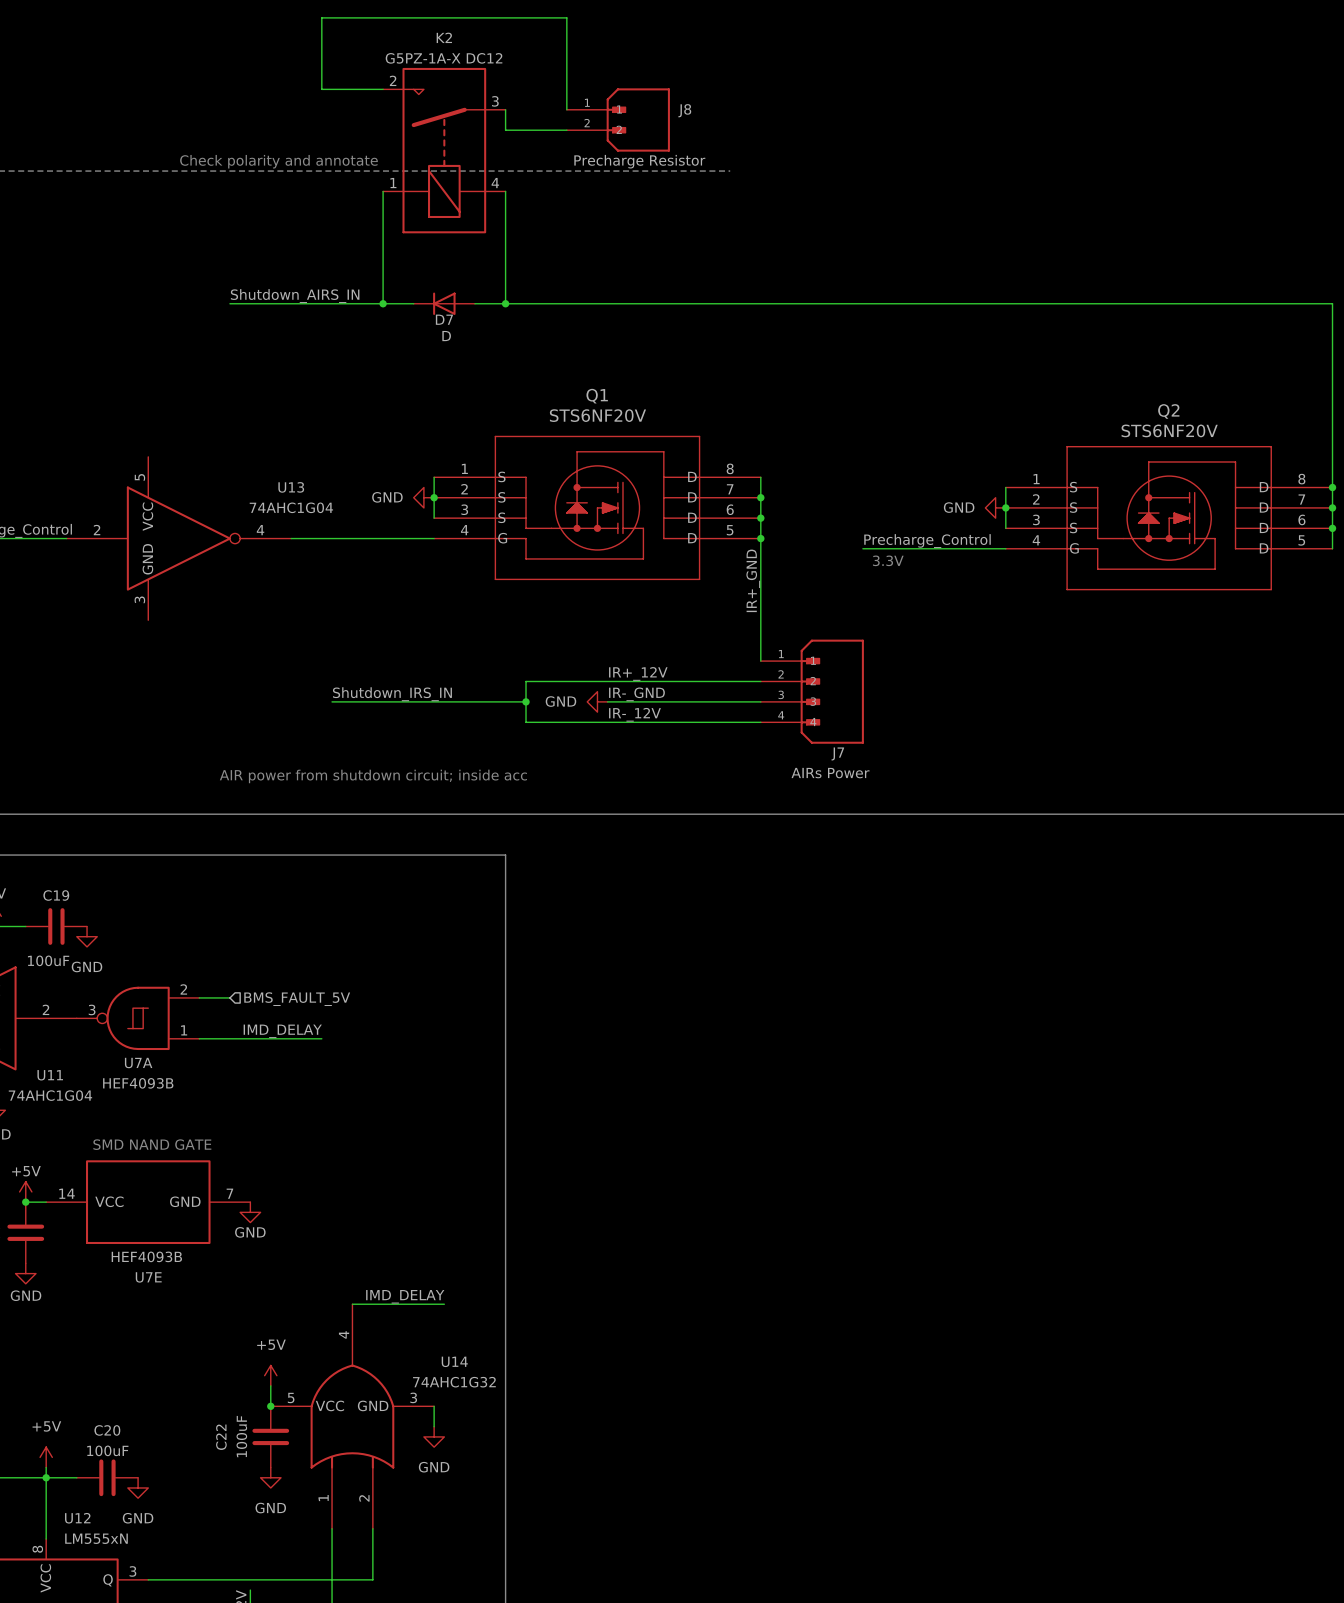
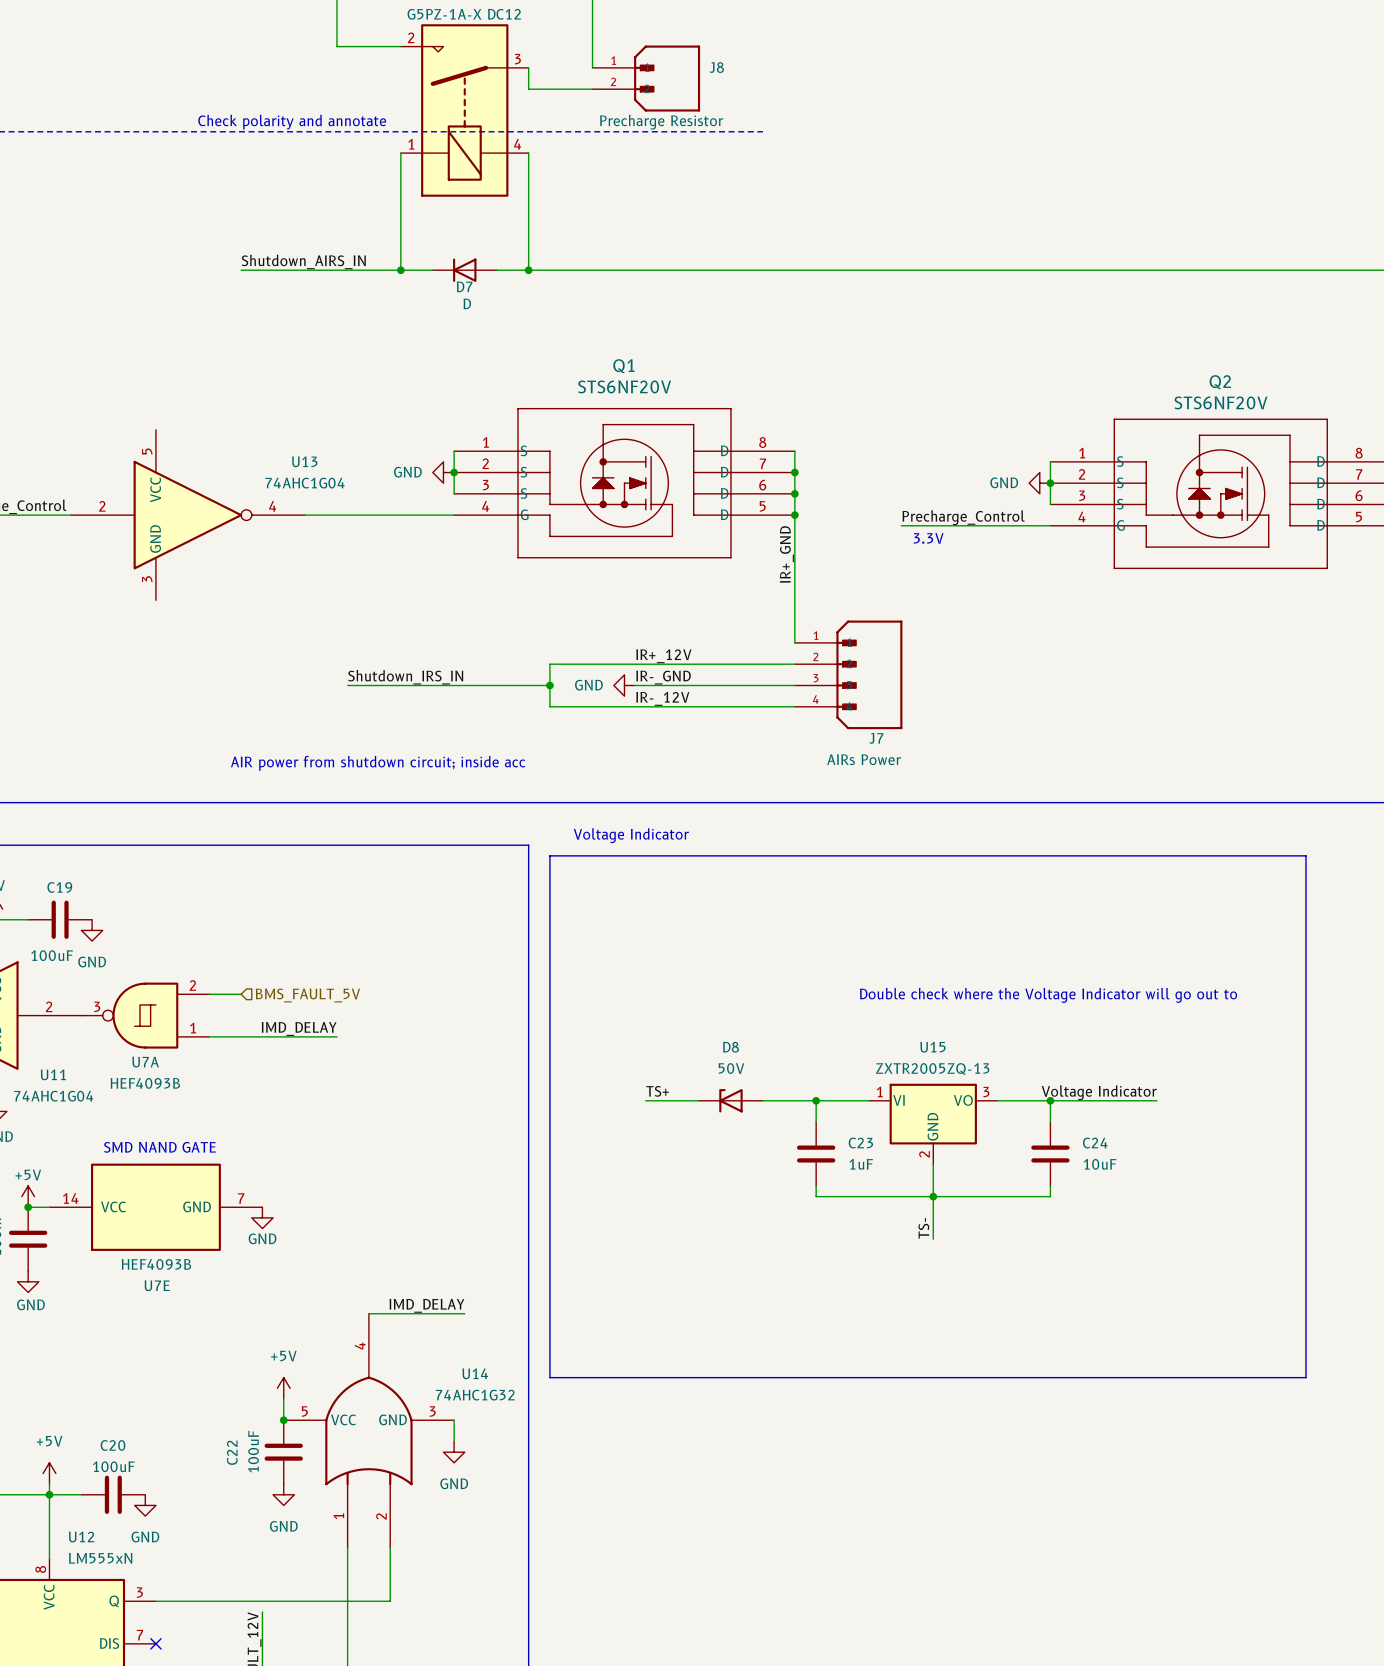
text: none -> Voltage Indicator (631, 835)
line: none -> (549, 855) (1305, 855) (1305, 1377) (549, 1377) (549, 855)
text: none -> Double check where the Voltage Indicator will go out to (1048, 995)
label: none -> TS+ (657, 1091)
label: none -> Voltage Indicator (1099, 1092)
wire: none -> (645, 1100) (699, 1100)
D8: none -> 50V (730, 1100)
wire: none -> (762, 1100) (869, 1100)
wire: none -> (816, 1100) (816, 1122)
junction: none -> (816, 1100)
wire: none -> (997, 1100) (1156, 1100)
wire: none -> (1050, 1100) (1050, 1122)
junction: none -> (1050, 1100)
U15: none -> ZXTR2005ZQ-13 (933, 1124)
C23: none -> 1uF (816, 1154)
C24: none -> 10uF (1050, 1154)
wire: none -> (933, 1164) (933, 1239)
wire: none -> (816, 1185) (816, 1196) (1050, 1196) (1050, 1185)
junction: none -> (933, 1196)
label: none -> TS- (923, 1228)

